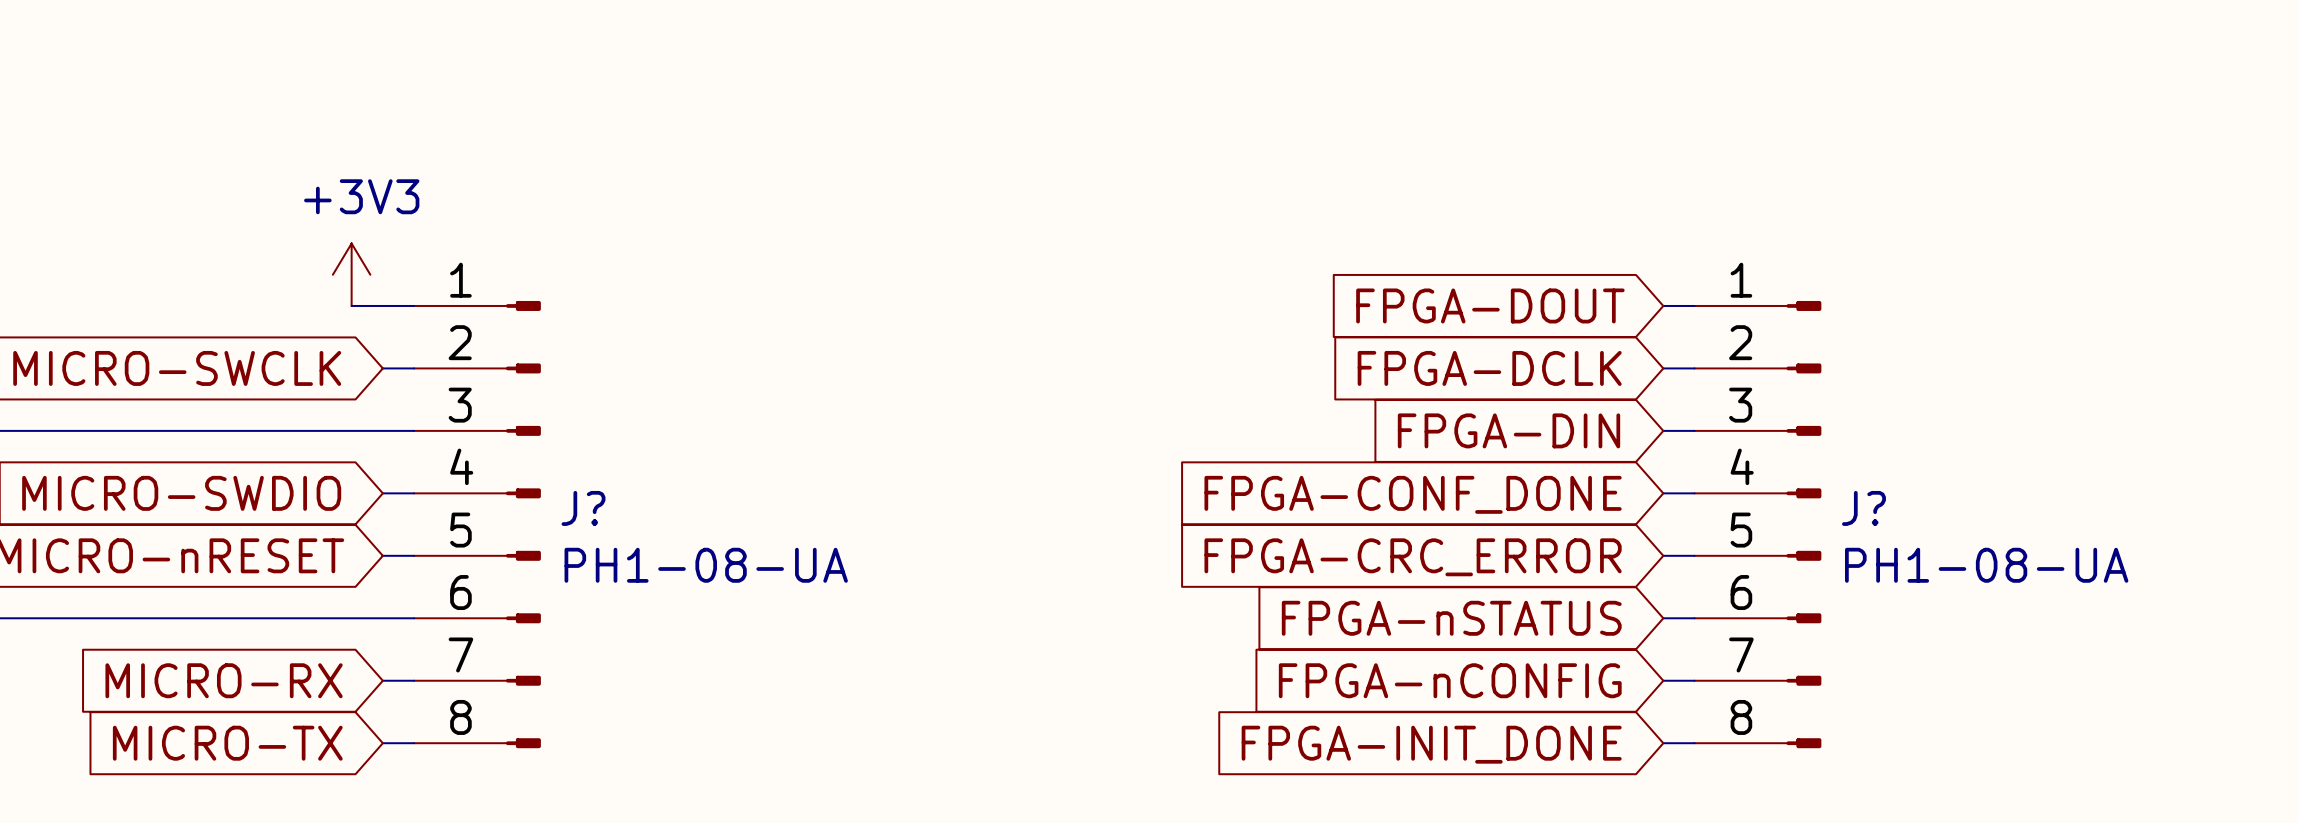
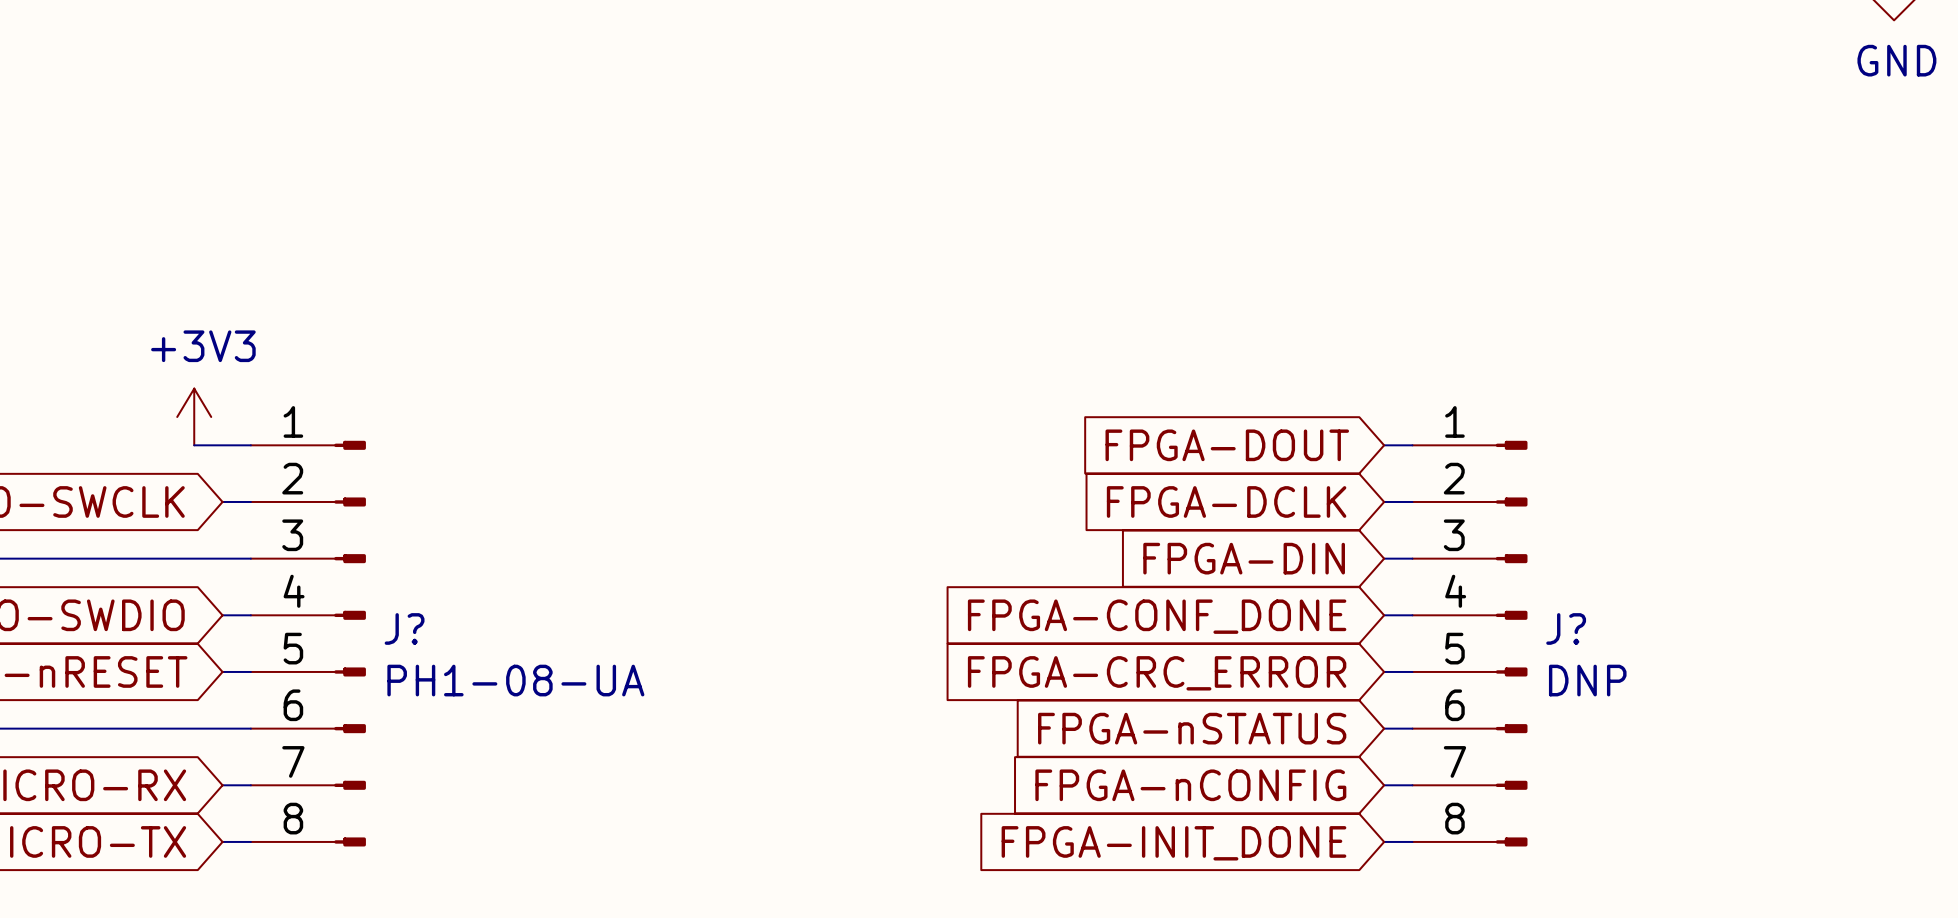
J? value: PH1-08-UA (1986, 565) -> DNP (1587, 680)

